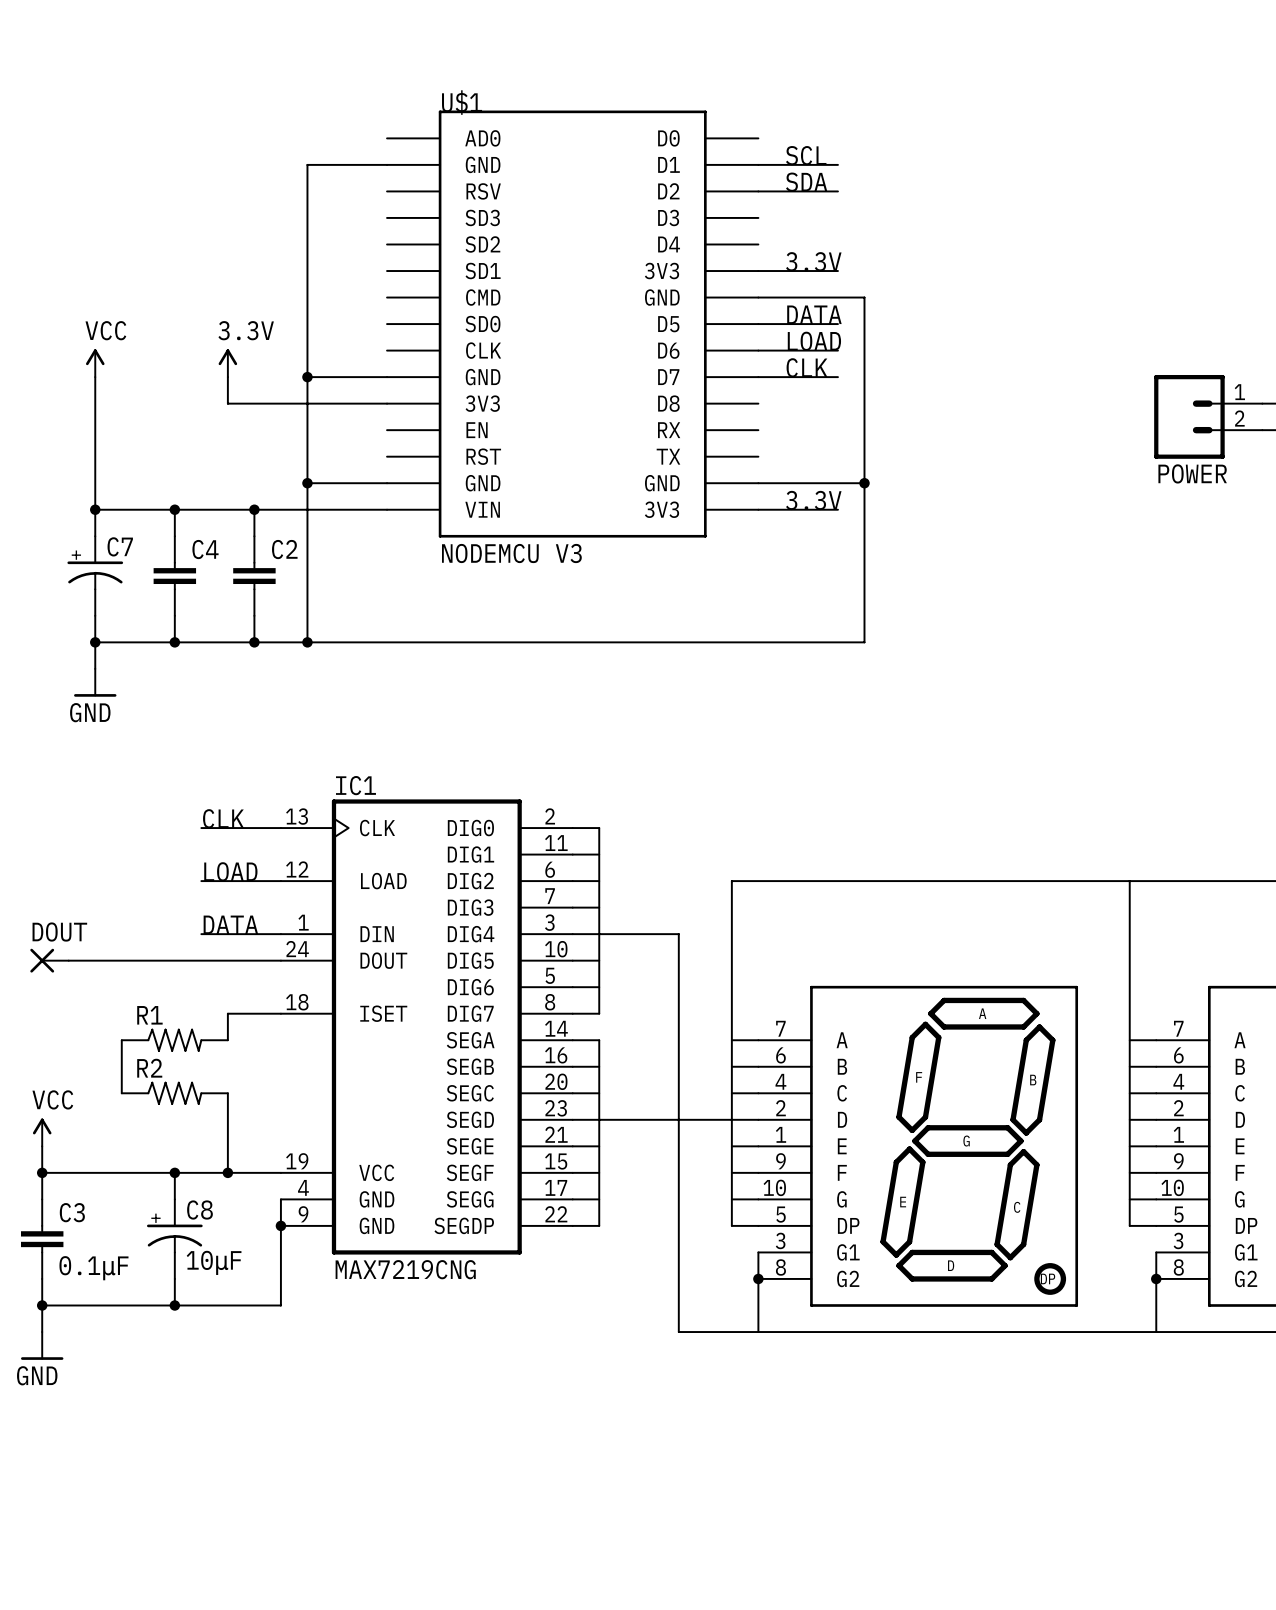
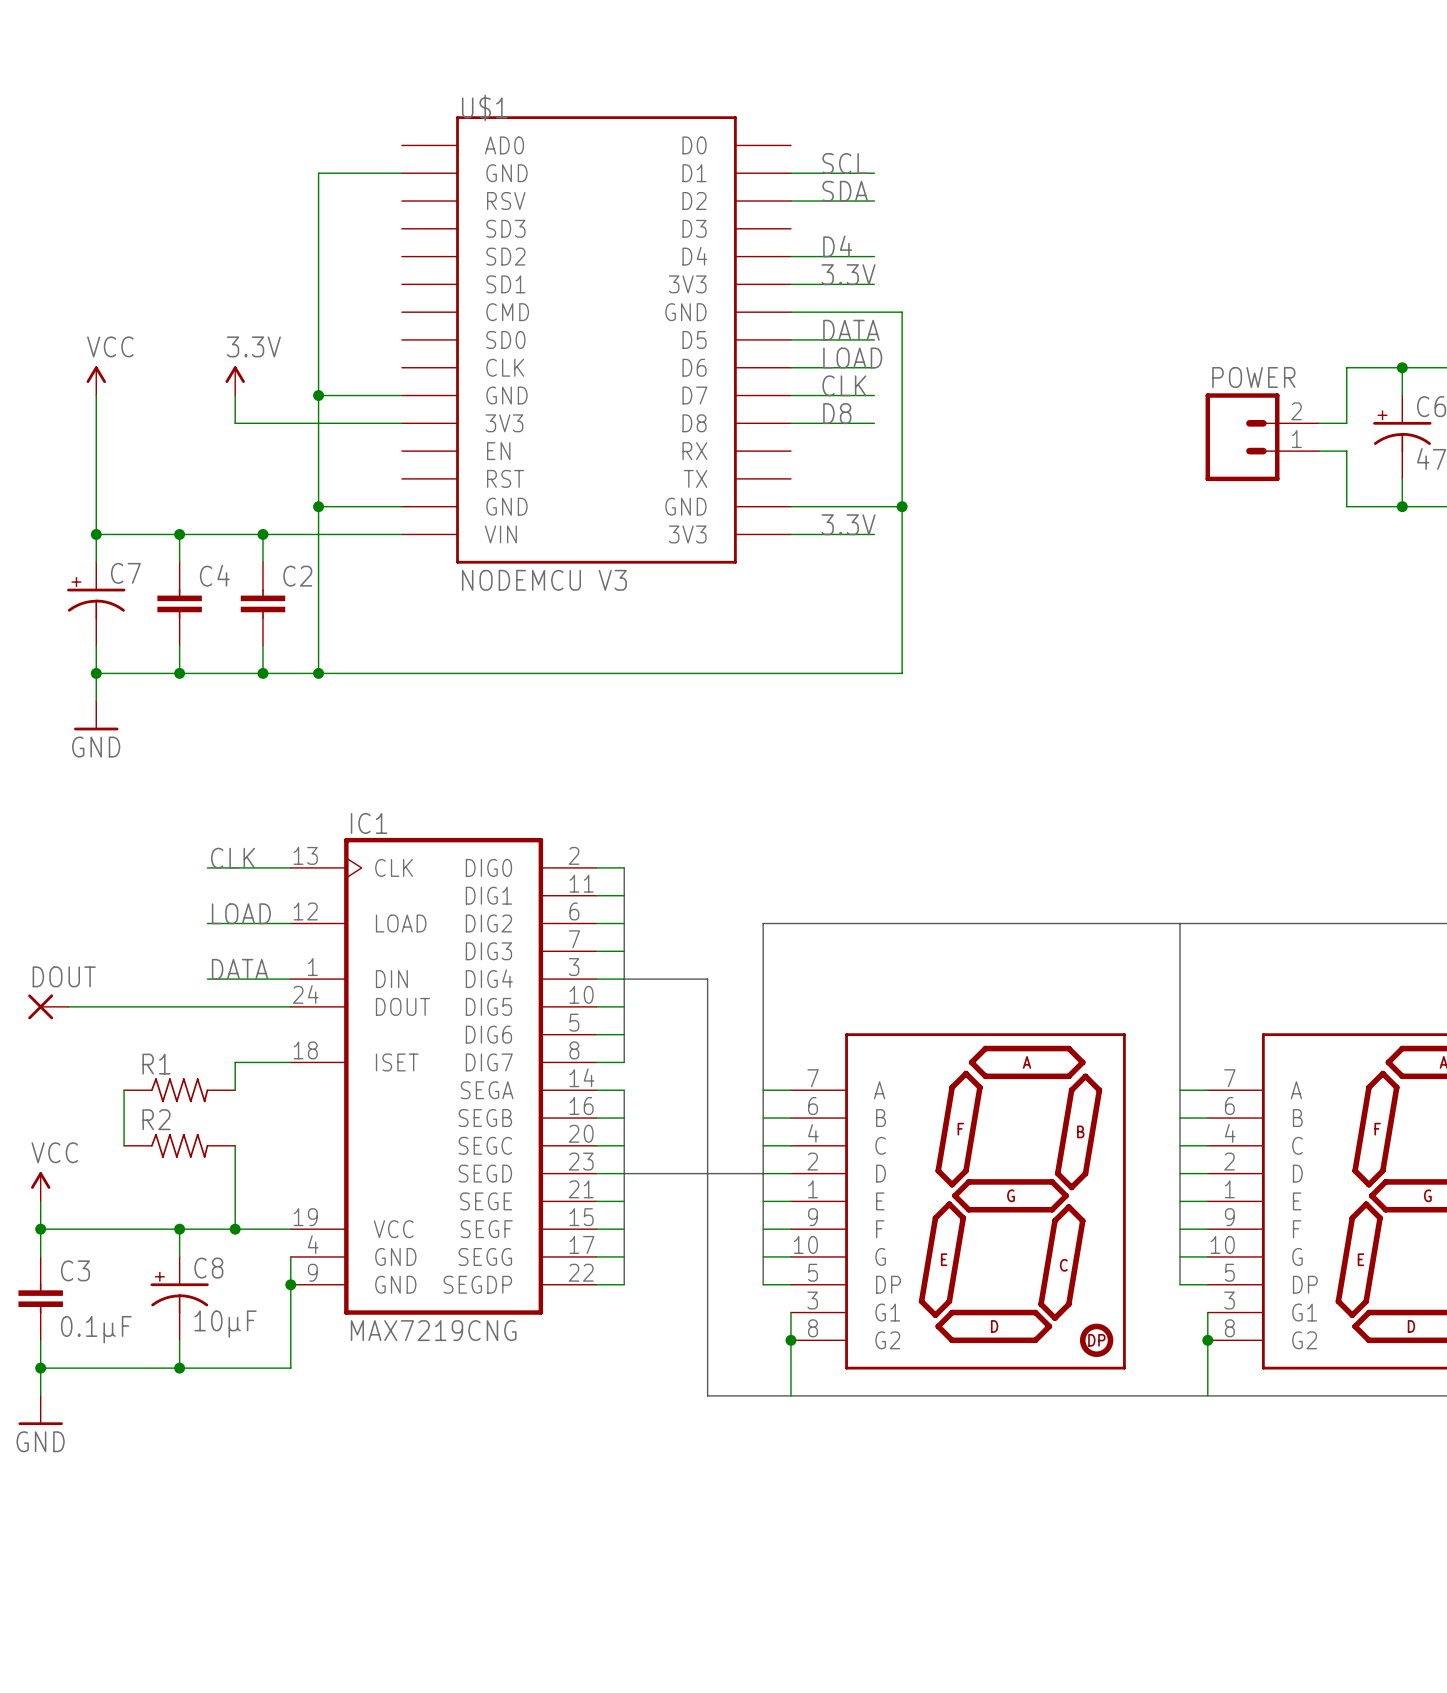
label: none -> D4 (837, 246)
wire: none -> (790, 256) (874, 256)
label: none -> D8 (837, 413)
wire: none -> (790, 423) (874, 423)
POWER flip: as is (1189, 416) -> up-down (1242, 437)

